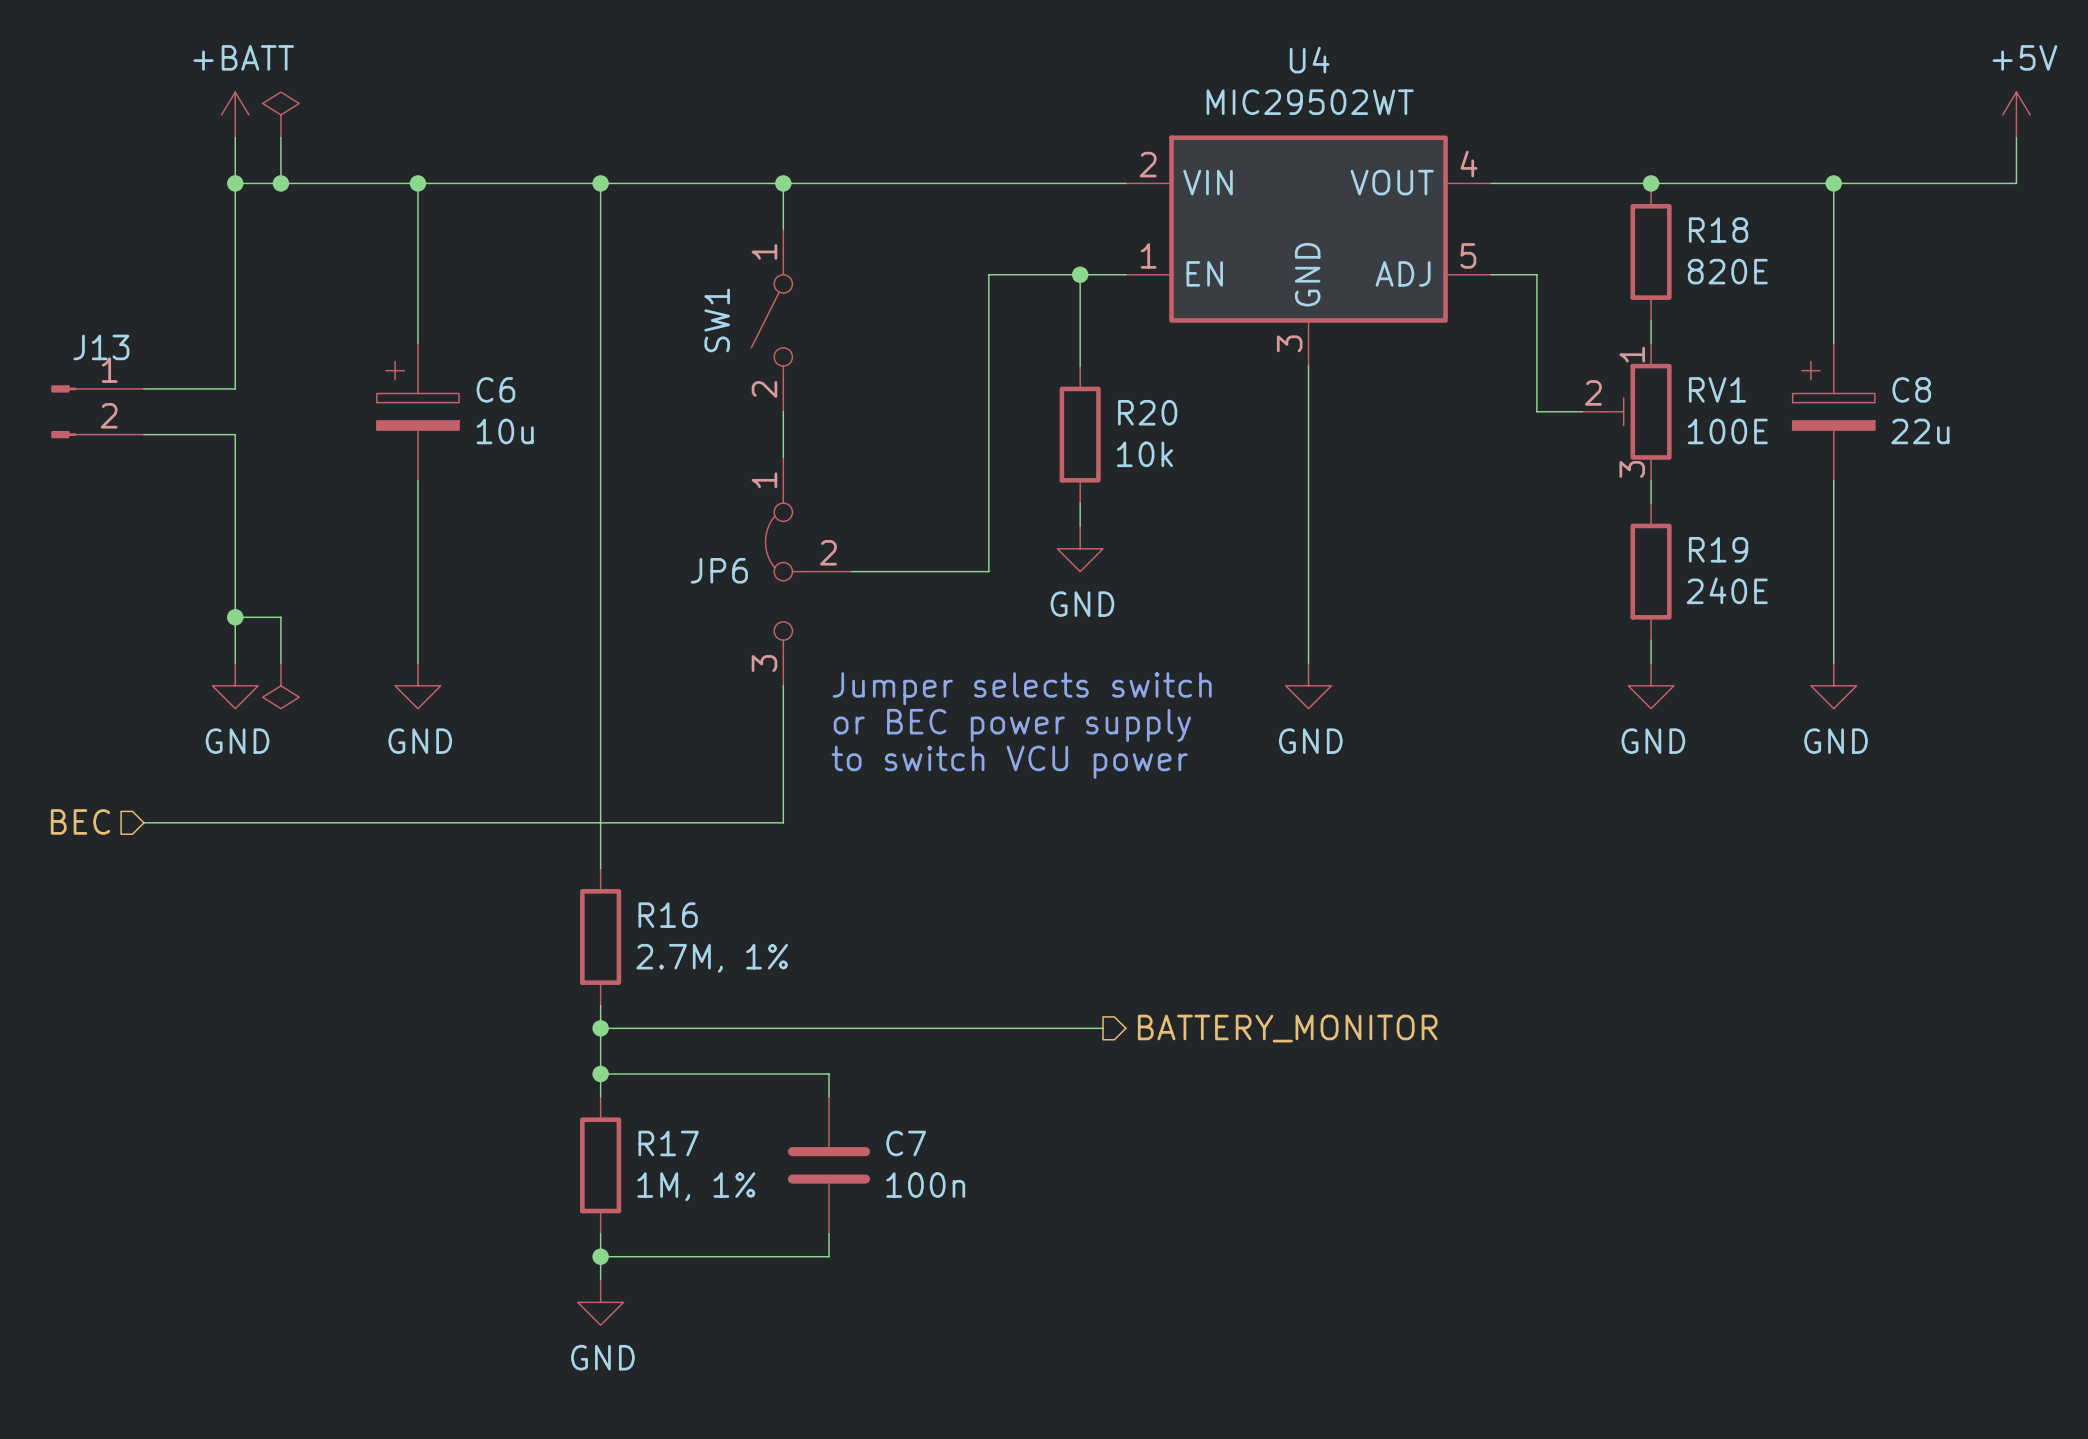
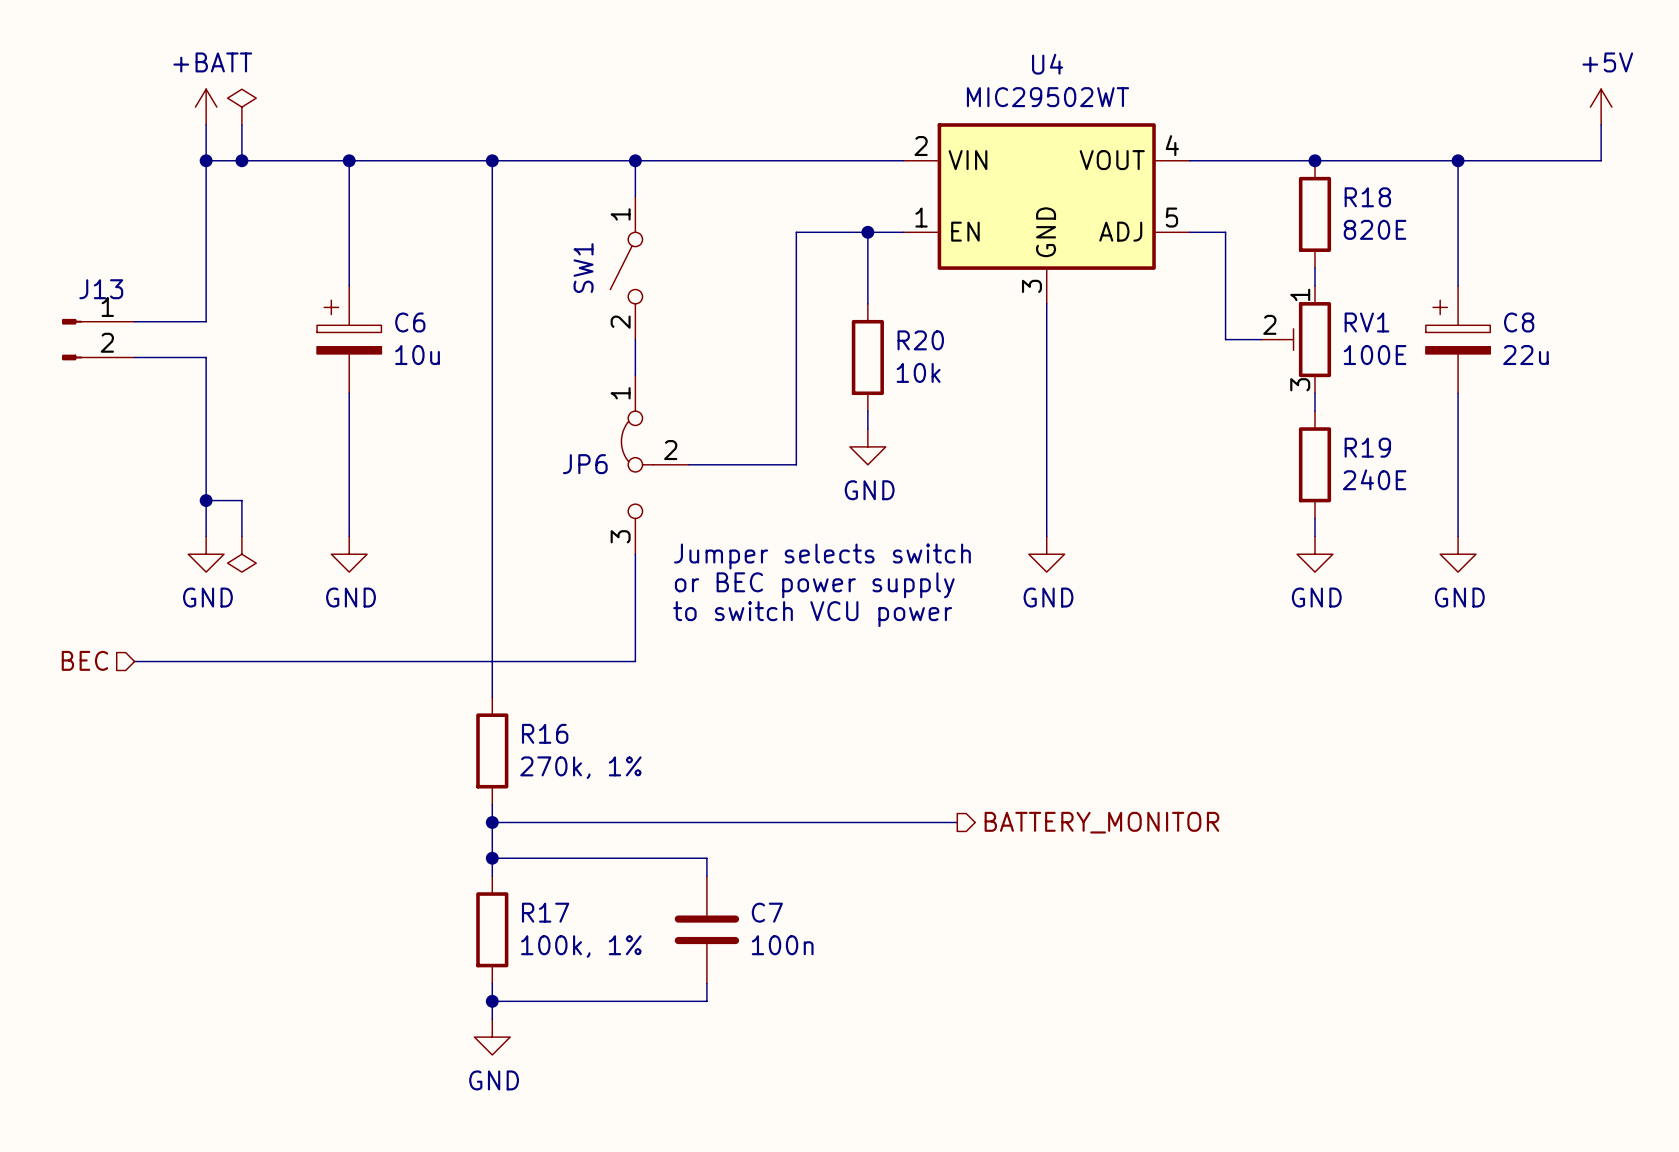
R16 value: 2.7M, 1% (712, 958) -> 270k, 1% (580, 767)
wire: none -> (885, 822) (957, 822)
hierarchical label position: BATTERY_MONITOR (1287, 1028) -> BATTERY_MONITOR (1101, 822)
wire: (828, 1074) (828, 1096) -> (671, 858) (706, 858) (706, 876)
C7 position: (828, 1165) -> (706, 929)
R17 value: 1M, 1% (696, 1186) -> 100k, 1% (581, 946)
wire: (828, 1233) (828, 1256) -> (706, 983) (706, 1001) (671, 1001)

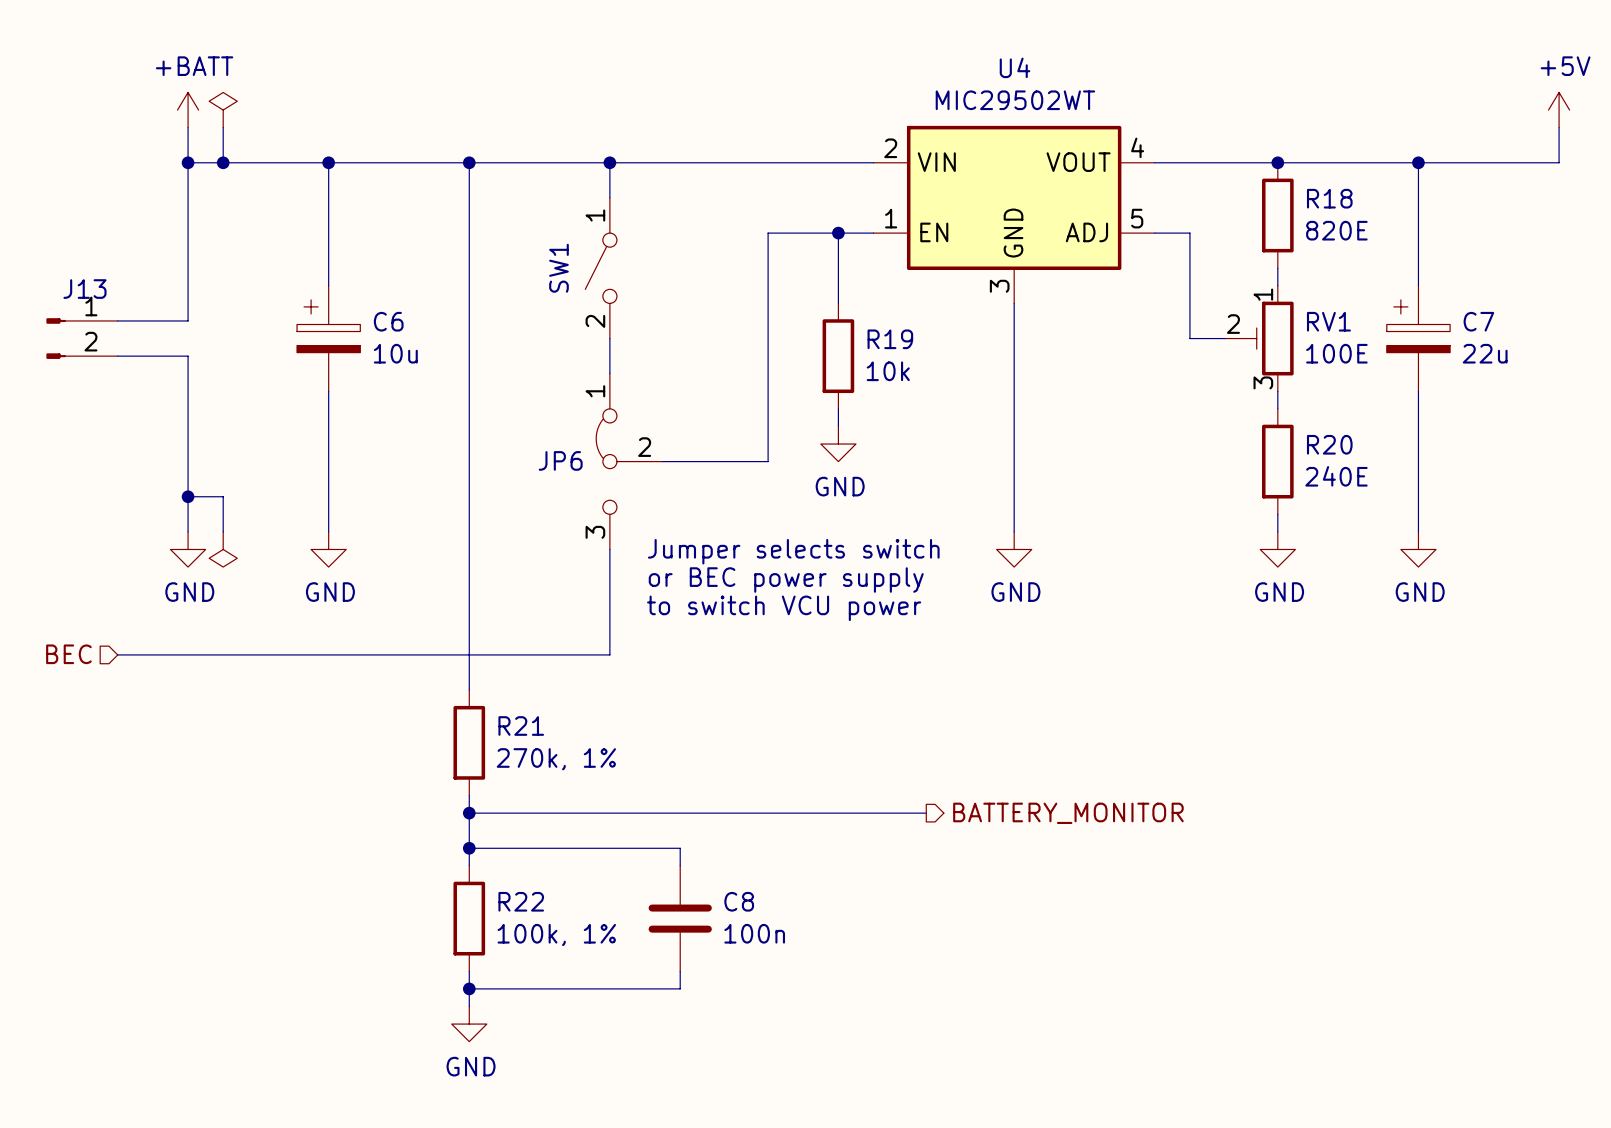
C8 name: C8 (1519, 322) -> C7 (1478, 321)
R20 name: R20 (920, 340) -> R19 (890, 339)
R19 name: R19 (1367, 447) -> R20 (1329, 444)
R16 name: R16 (545, 733) -> R21 (521, 726)
R17 name: R17 (545, 912) -> R22 (521, 901)
C7 name: C7 (767, 912) -> C8 (739, 901)

